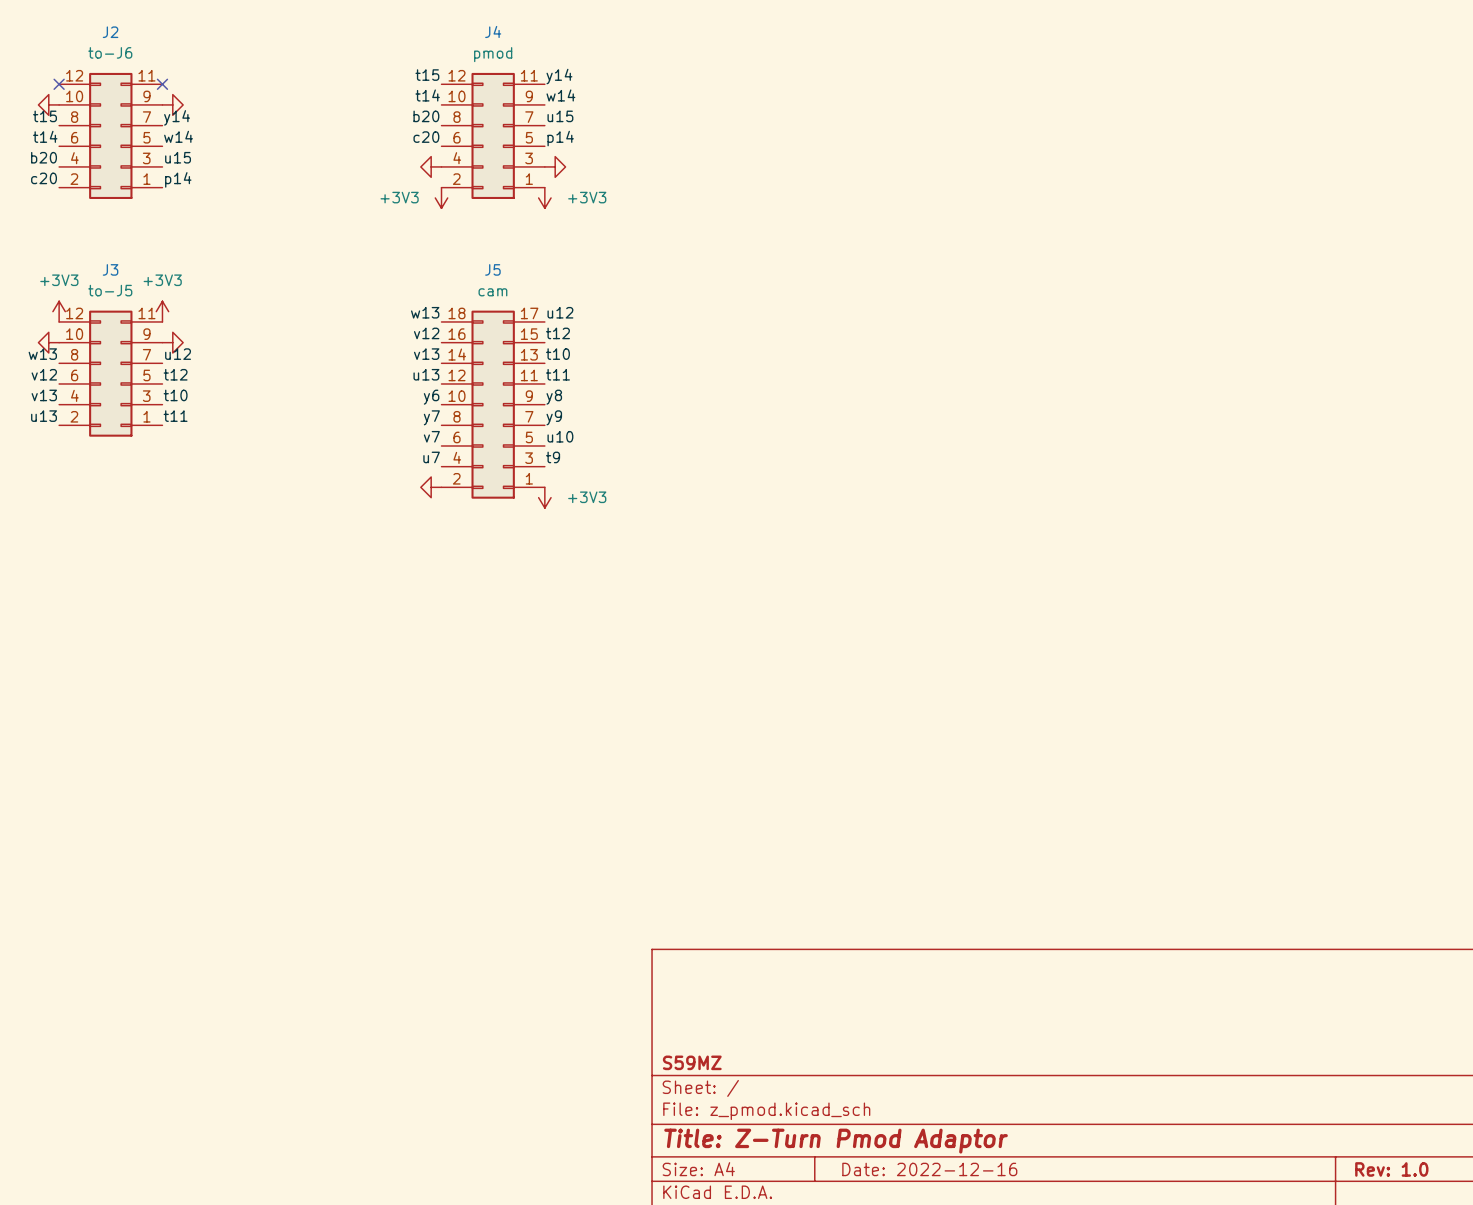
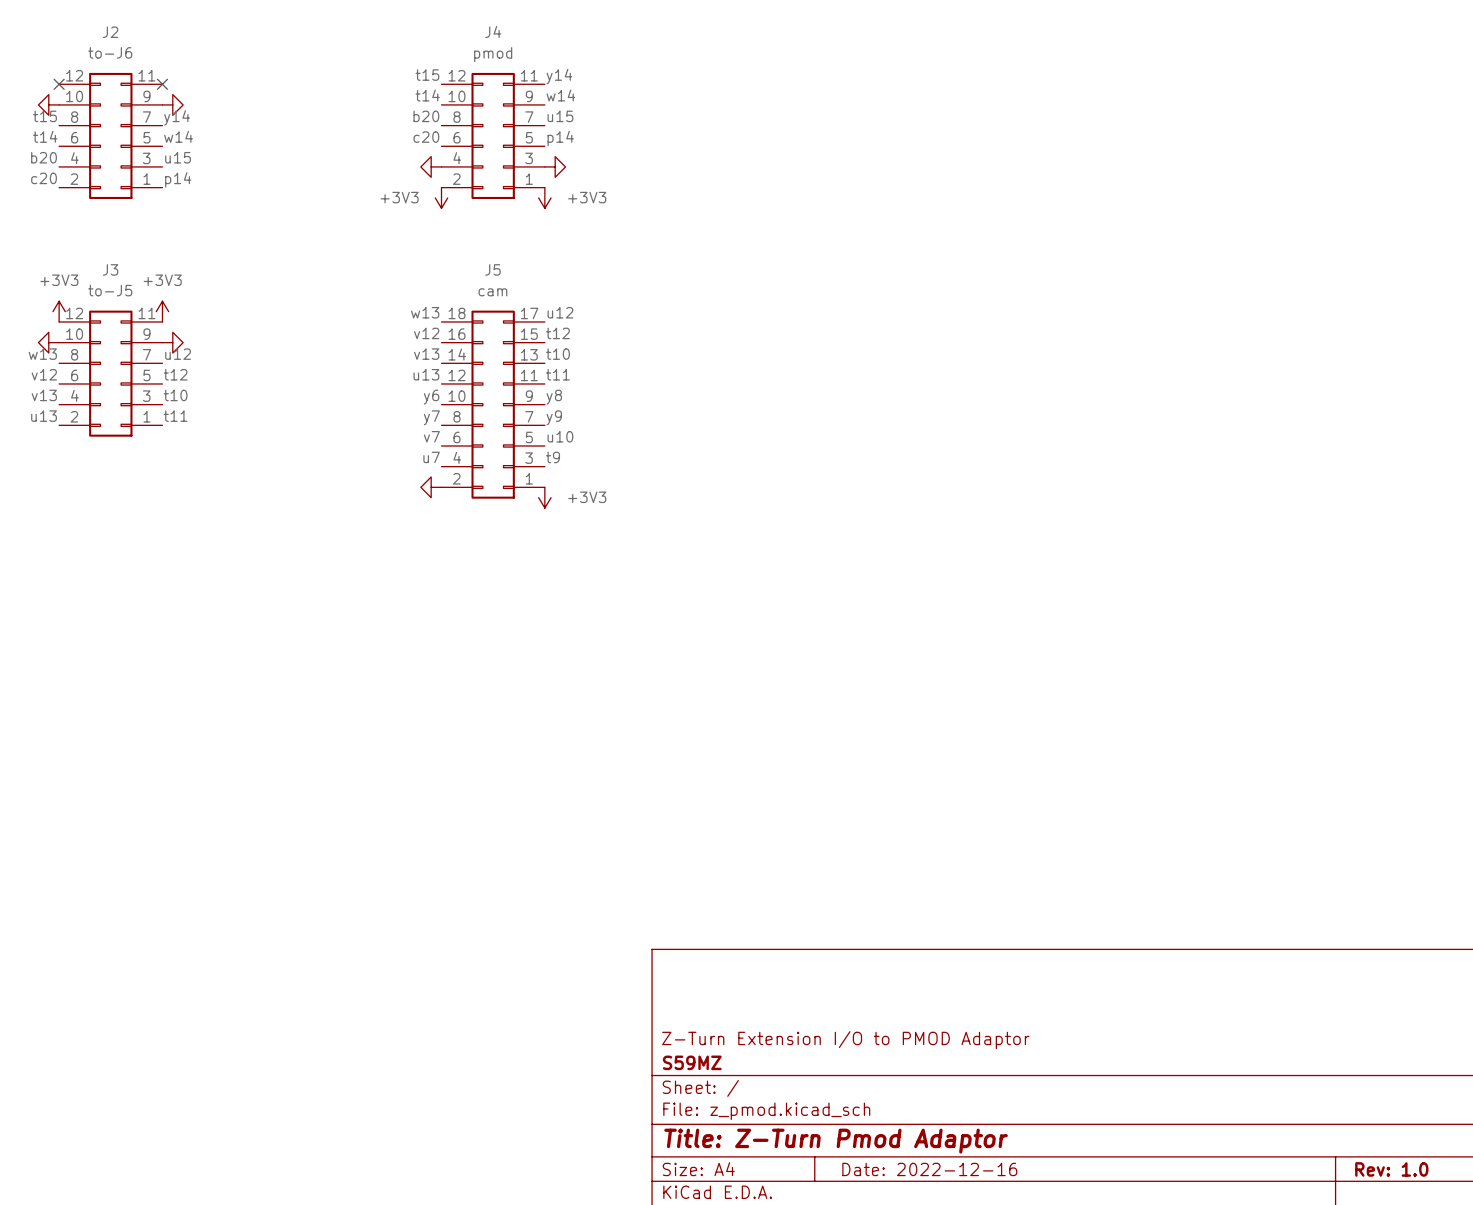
title block: none -> Z-Turn Extension I/O to PMOD Adaptor (845, 1040)

